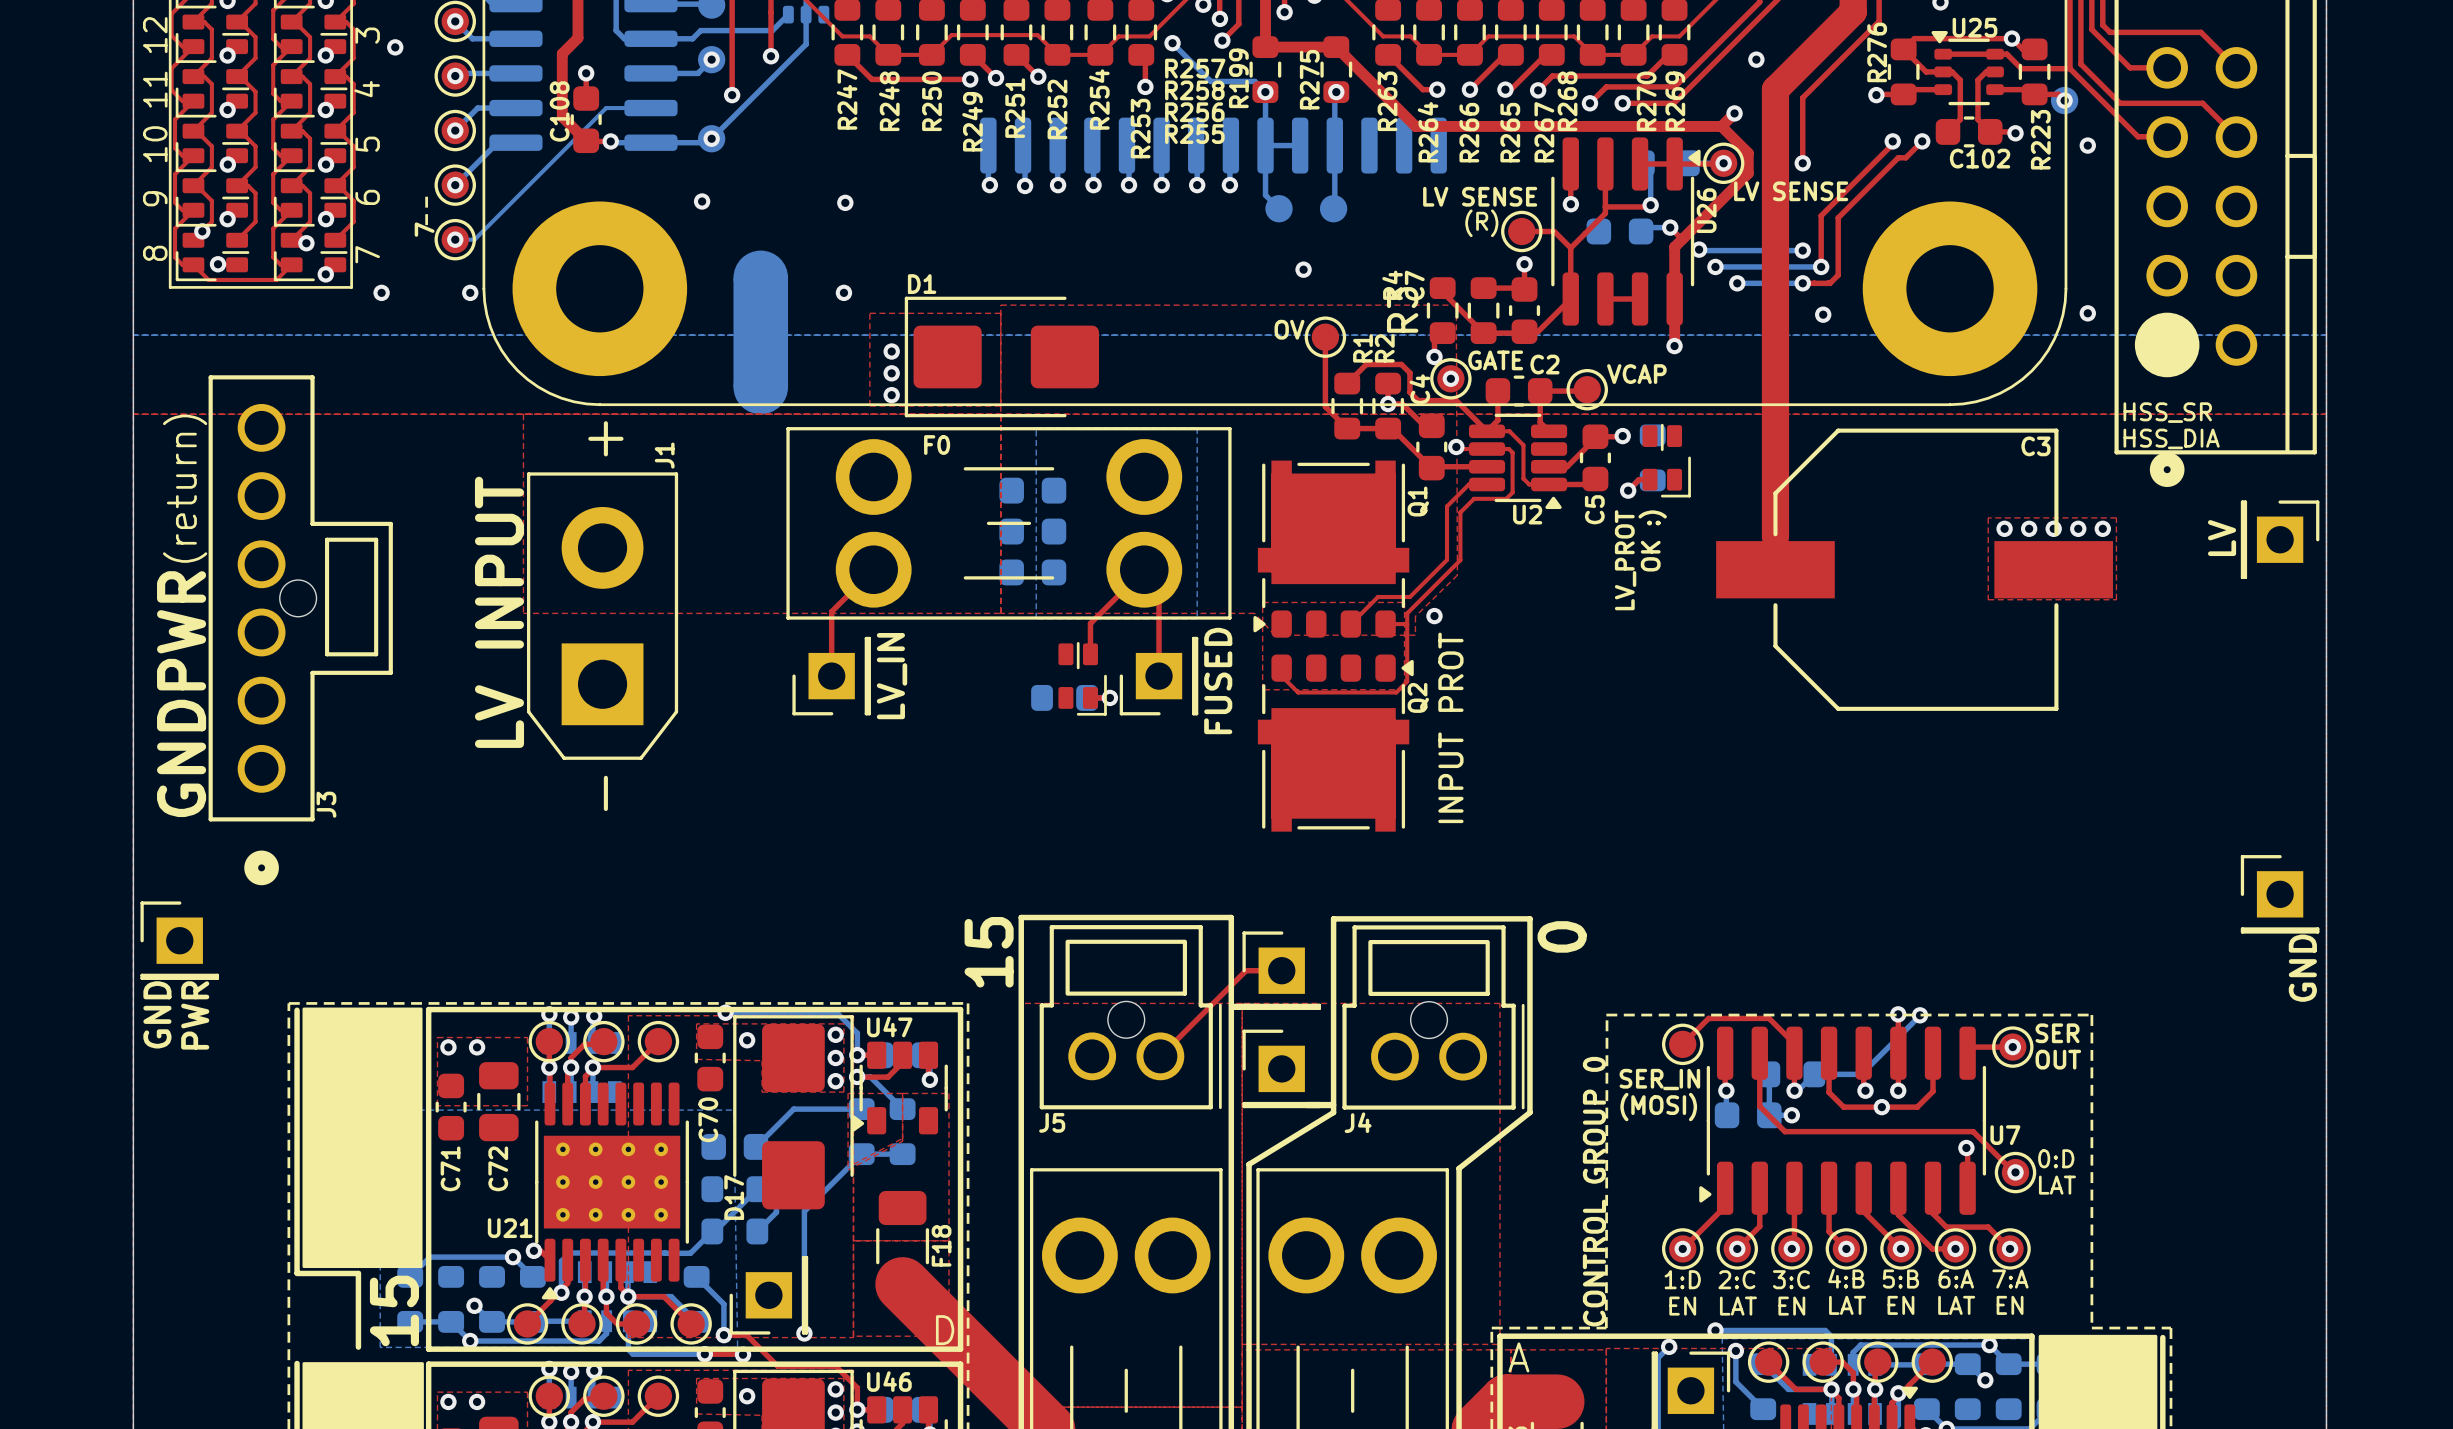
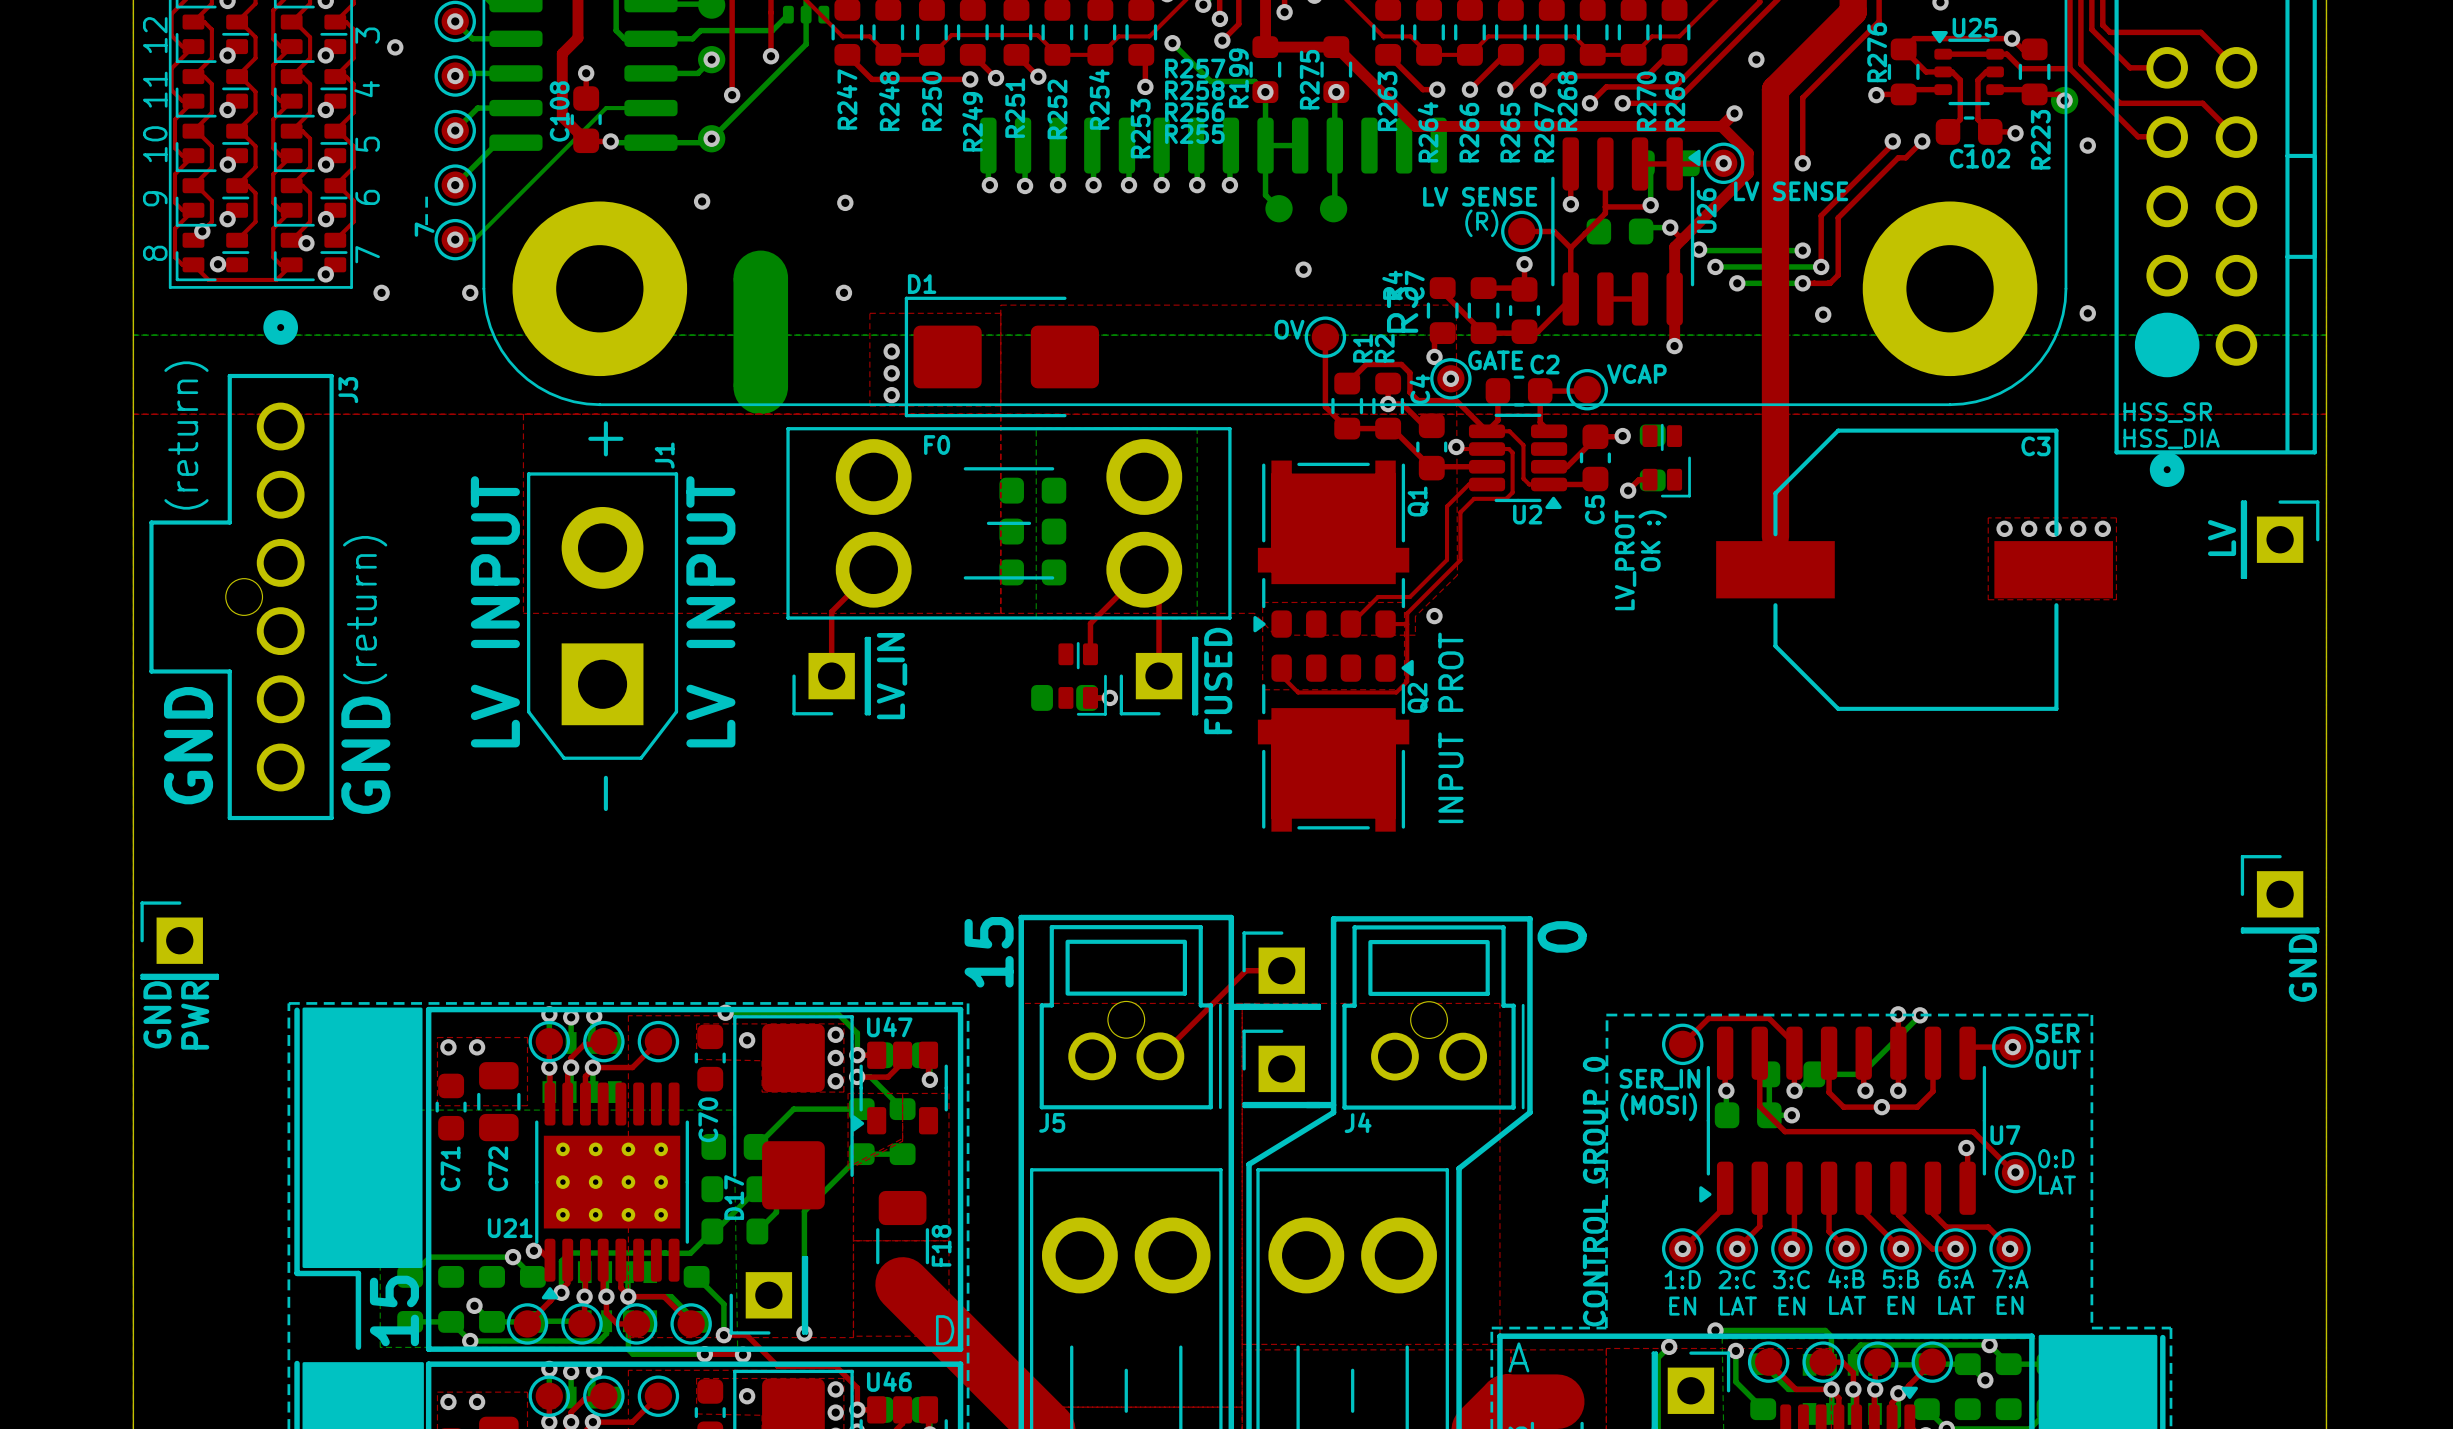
text position: (return) (185, 488) -> (return) (186, 435)
line: (327, 539) (376, 539) (376, 654) (327, 654) (327, 539) -> none
text: none -> (return) (365, 610)
text: none -> LV INPUT (710, 611)
text position: LV INPUT (499, 612) -> LV INPUT (495, 611)
J3 rotation: 0° (300, 630) -> 180° (241, 565)
text: GNDPWR (181, 694) -> GND (188, 745)
text: none -> GND (365, 755)
J3 name position: J3 (326, 804) -> J3 (348, 390)

